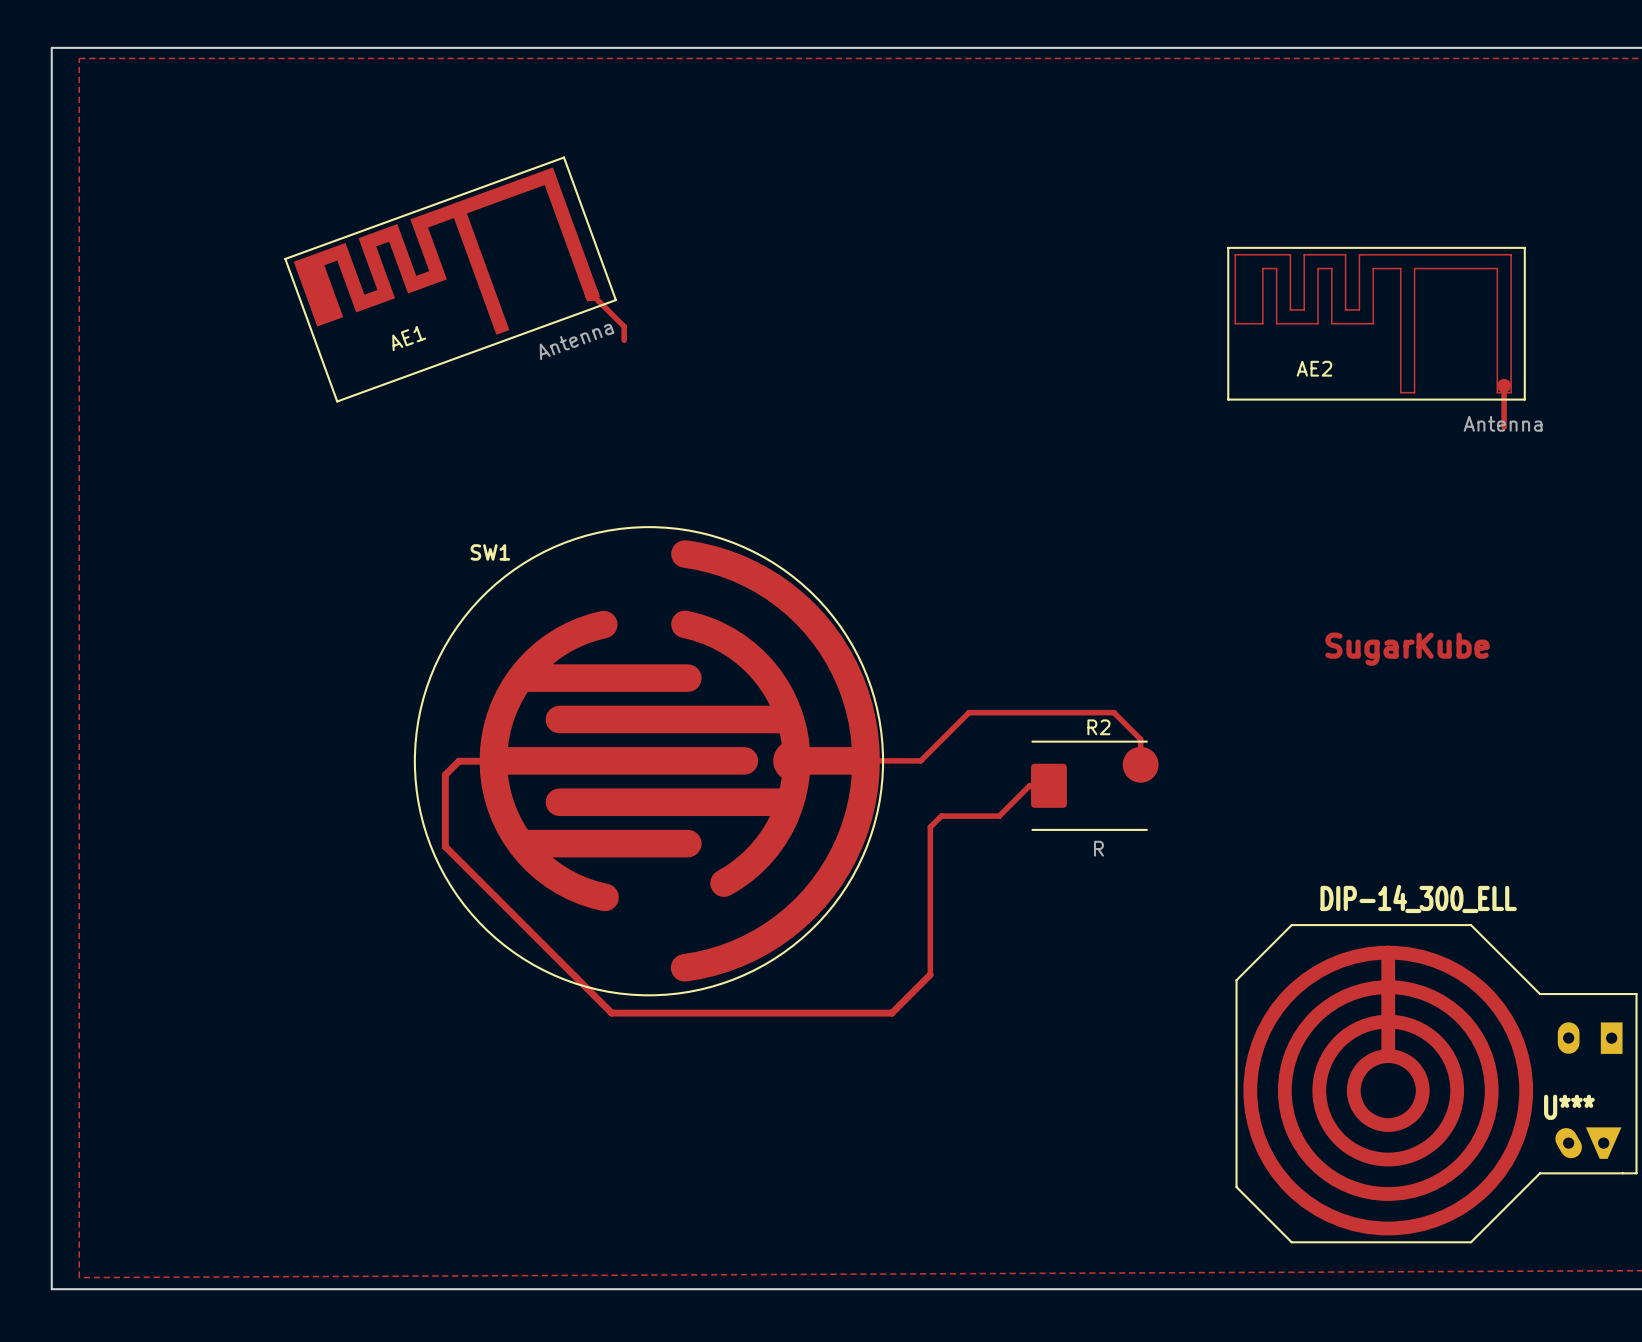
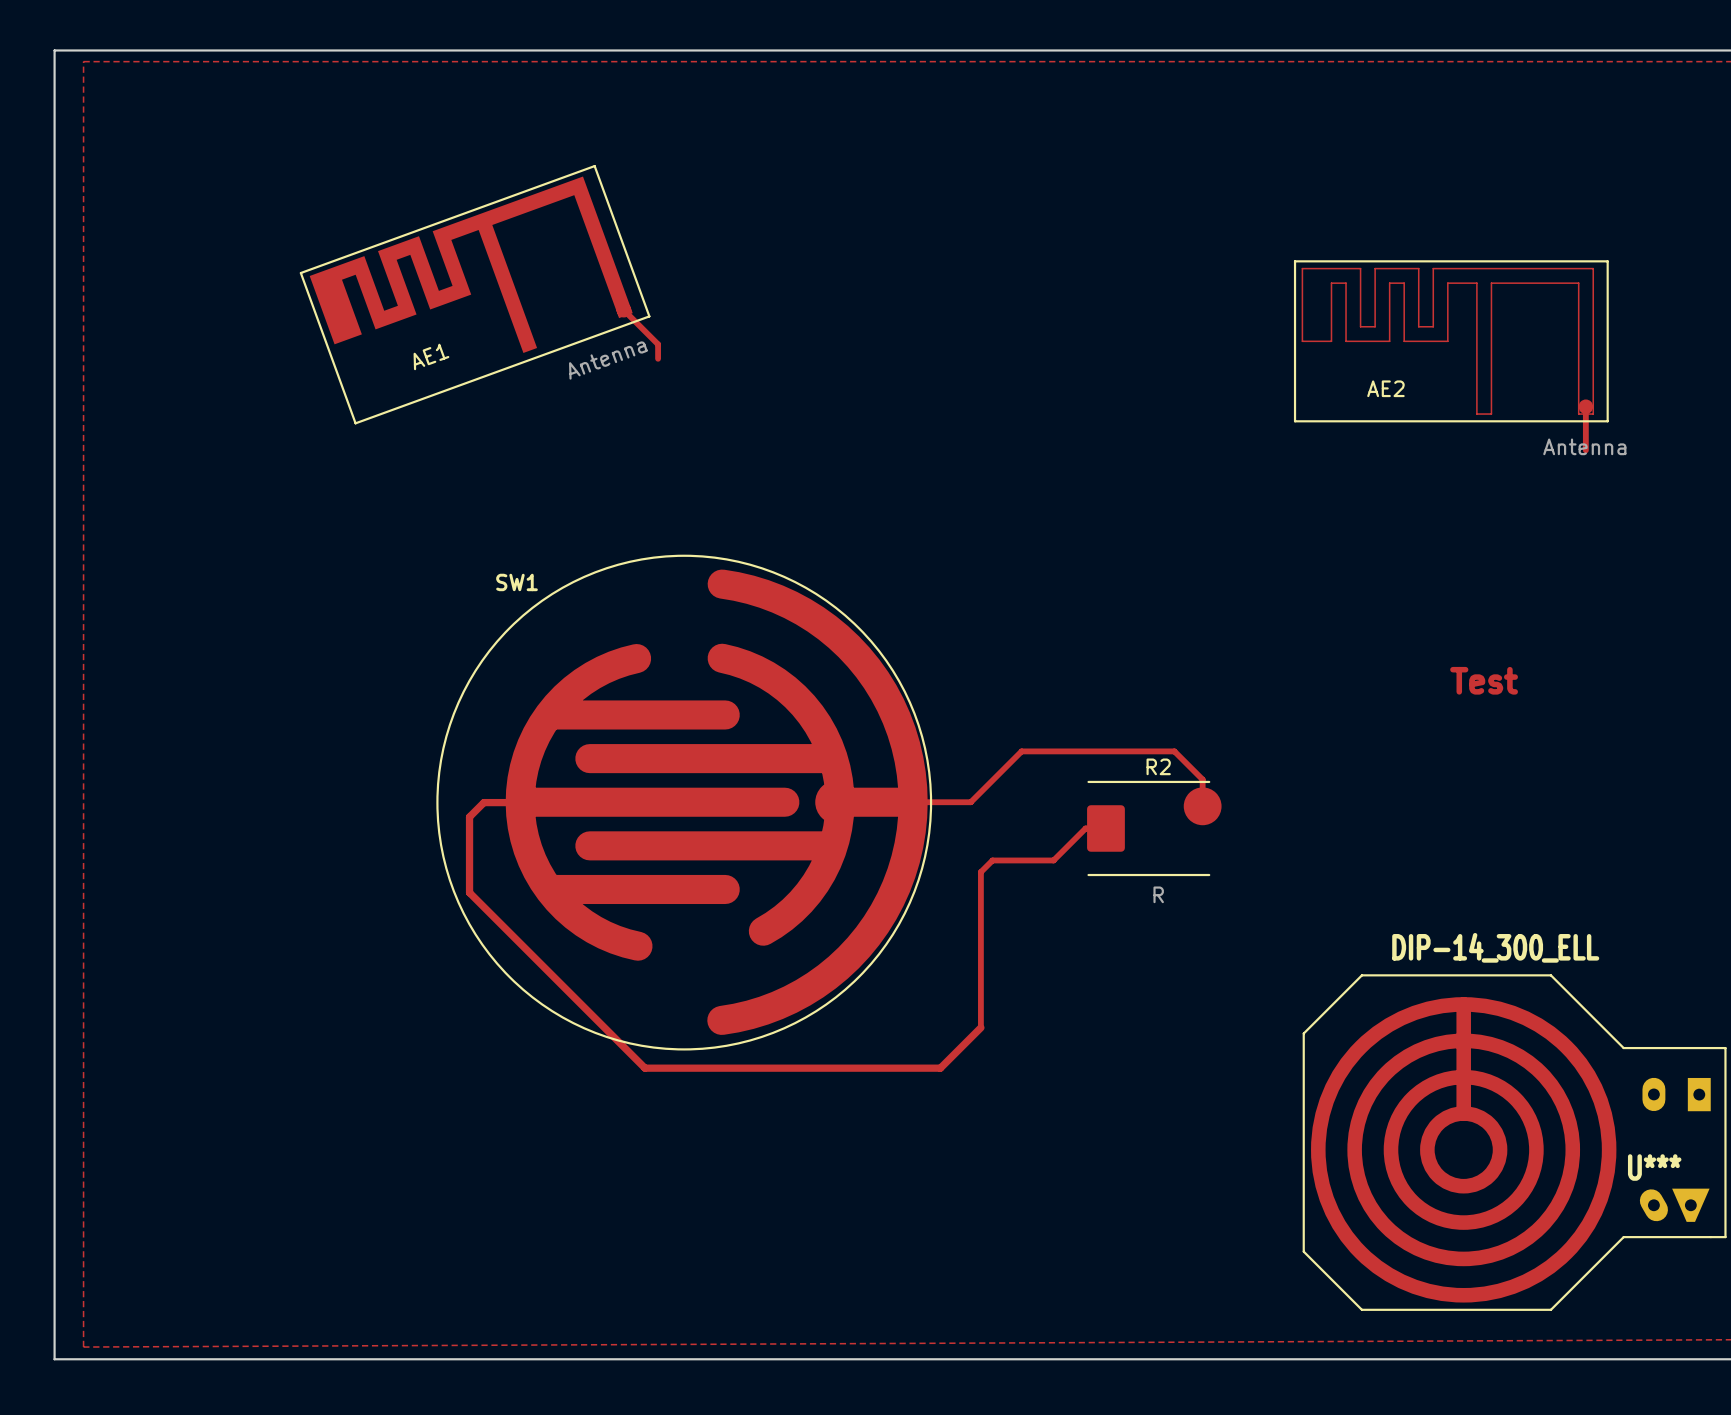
text: SugarKube (1407, 649) -> Test (1484, 680)

